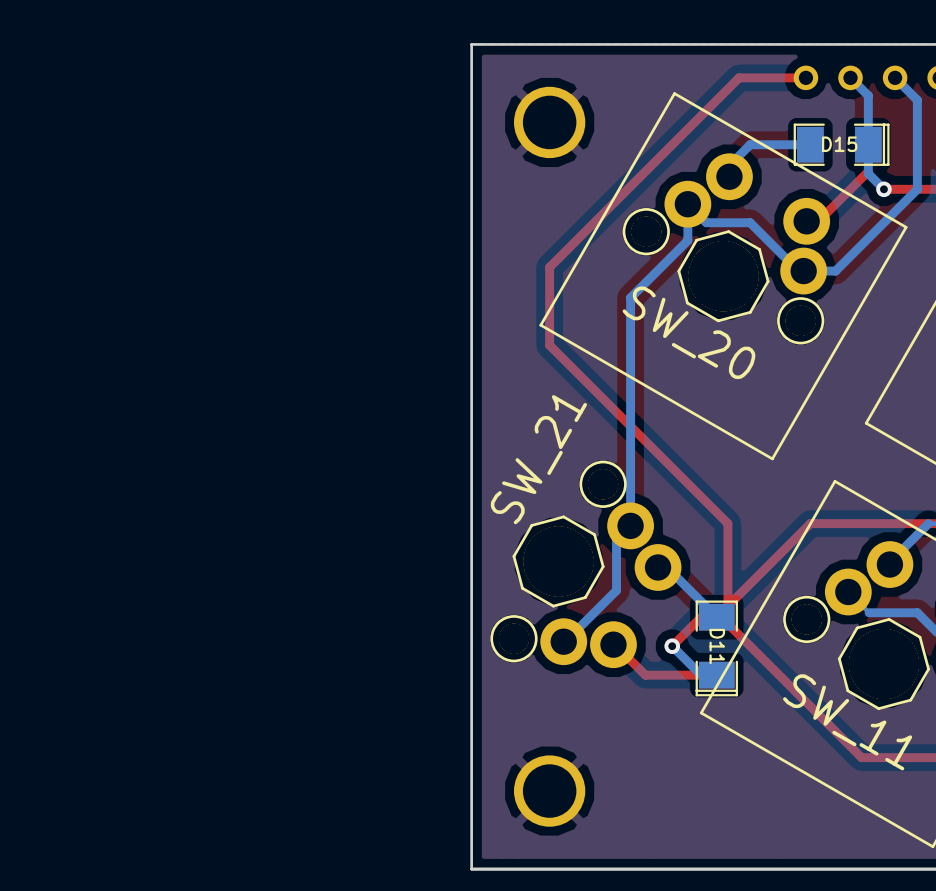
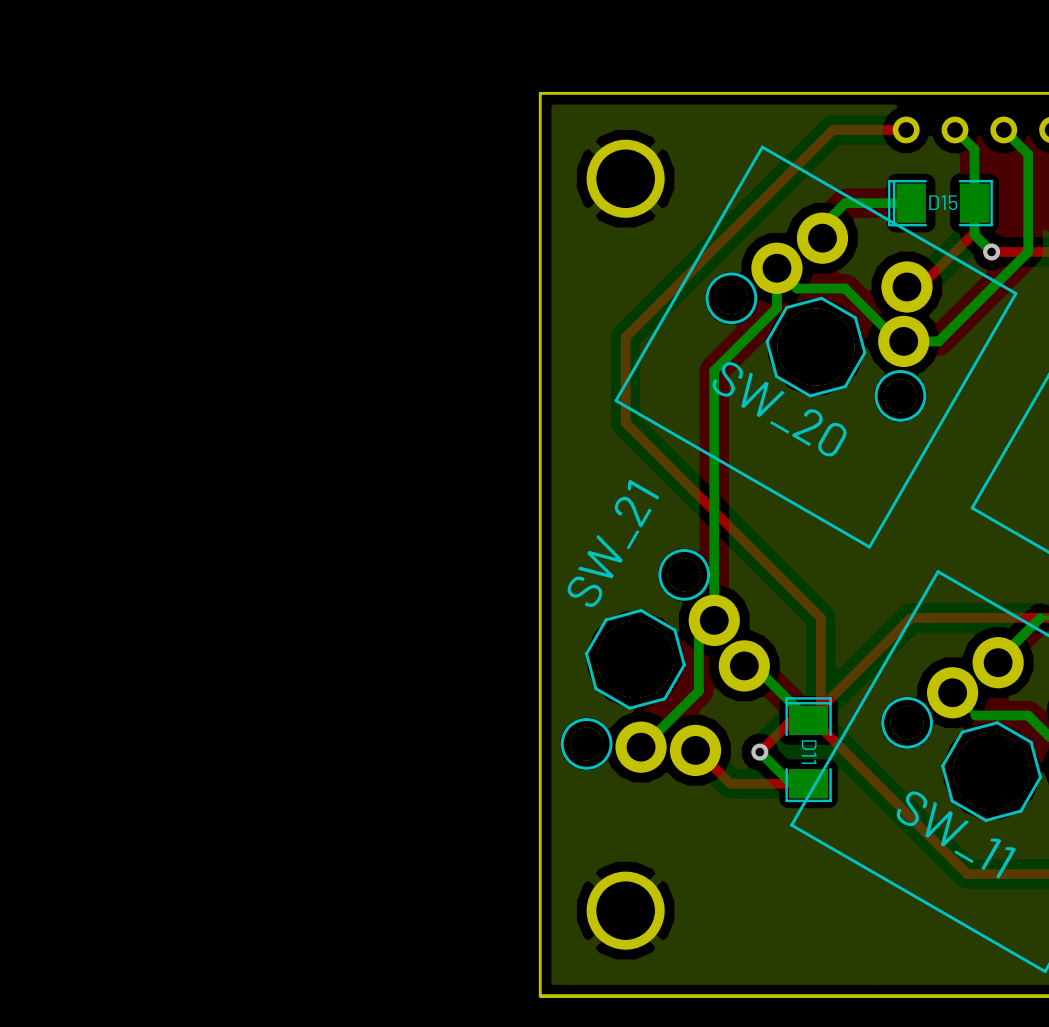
D15 rotation: 0° (841, 144) -> 180° (940, 203)
D11 rotation: 0° (716, 648) -> 180° (808, 749)

